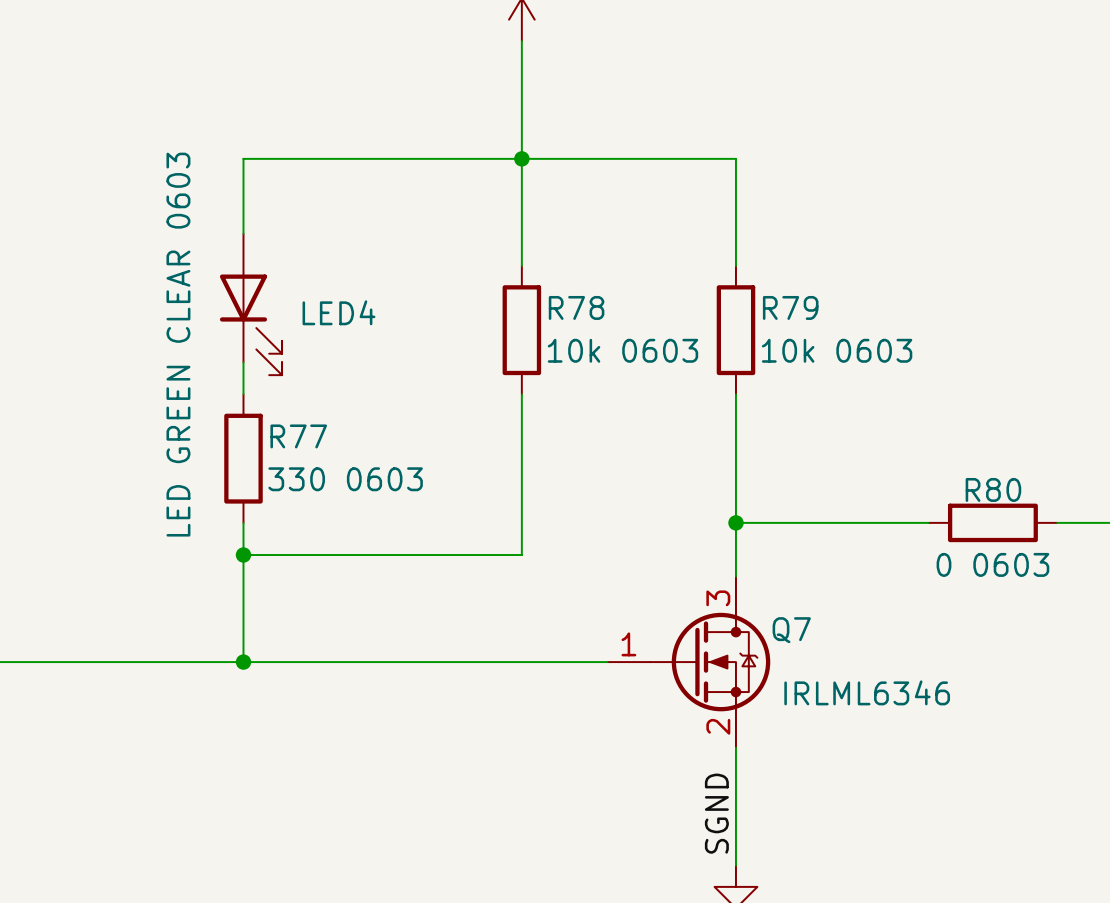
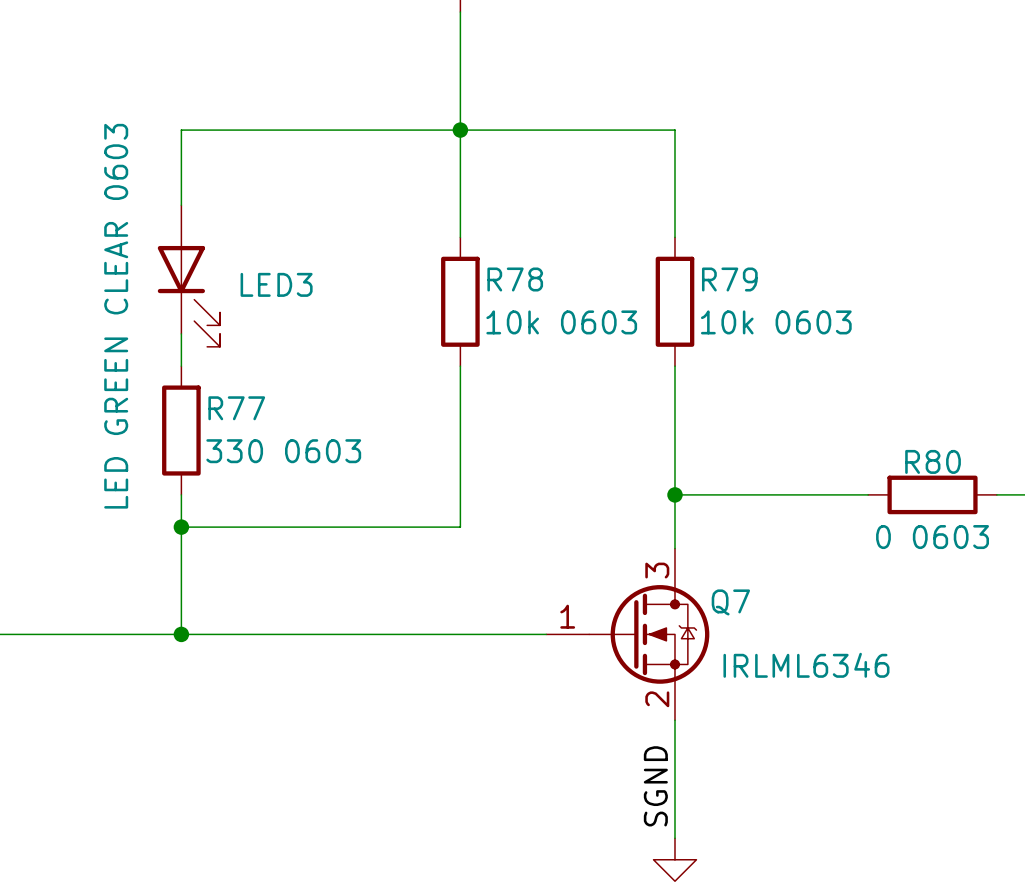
LED4 name: LED4 (338, 312) -> LED3 (276, 284)

